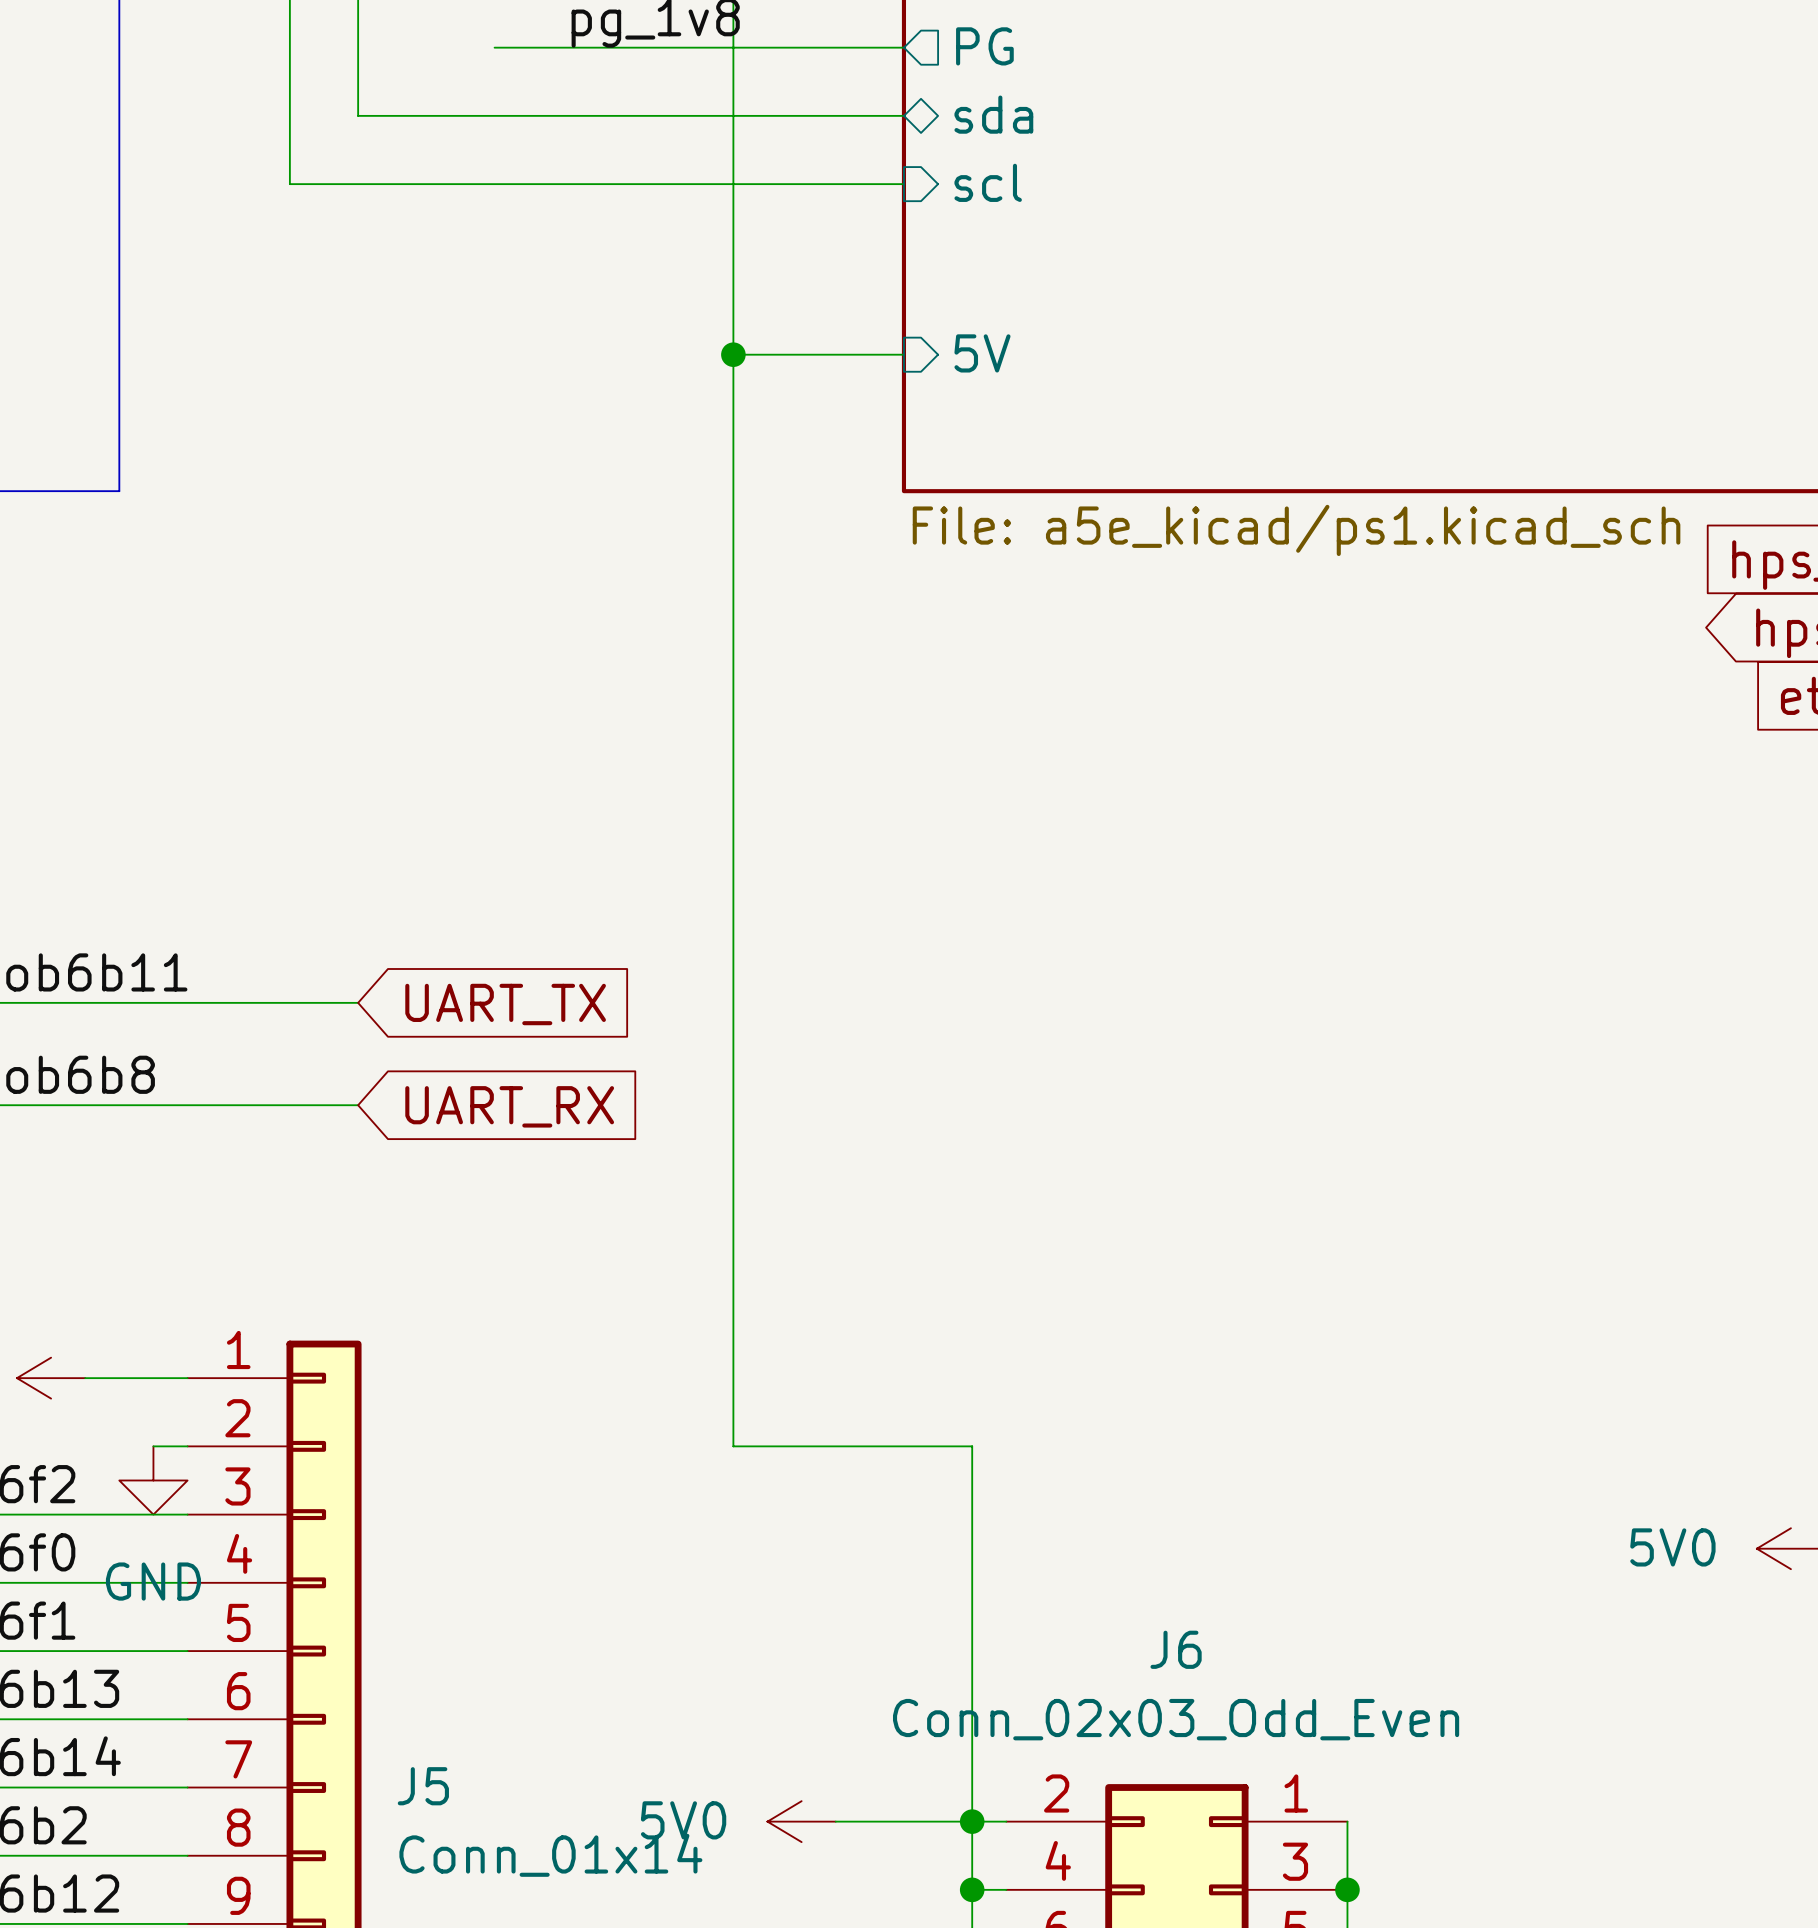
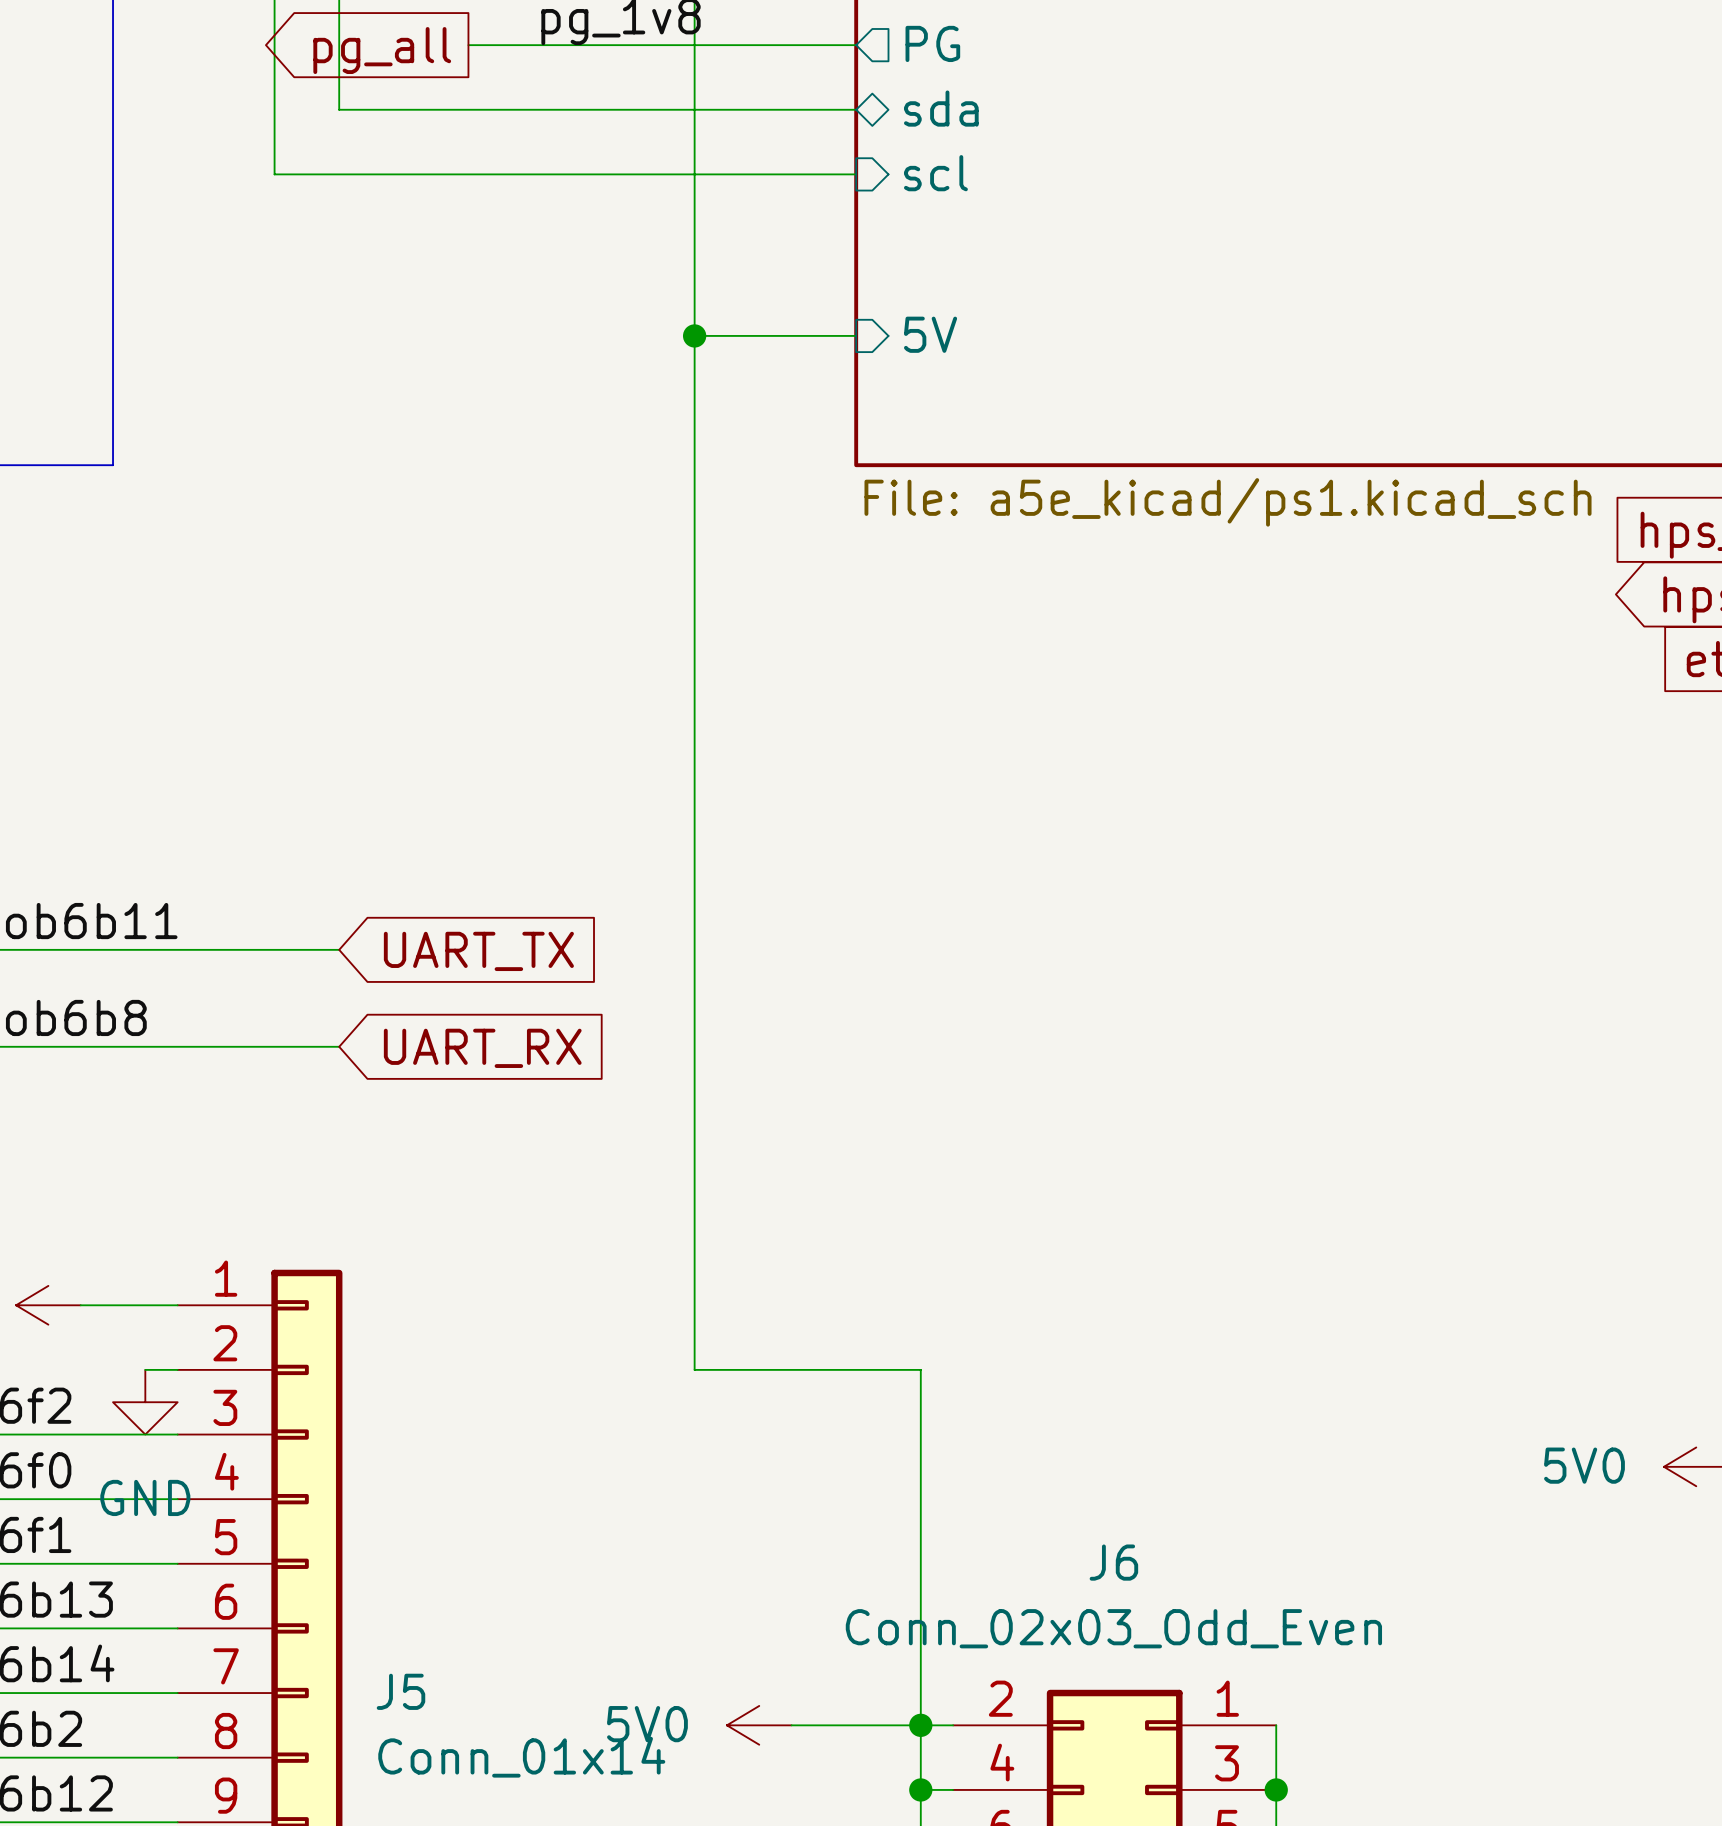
global label: none -> pg_all (382, 50)

